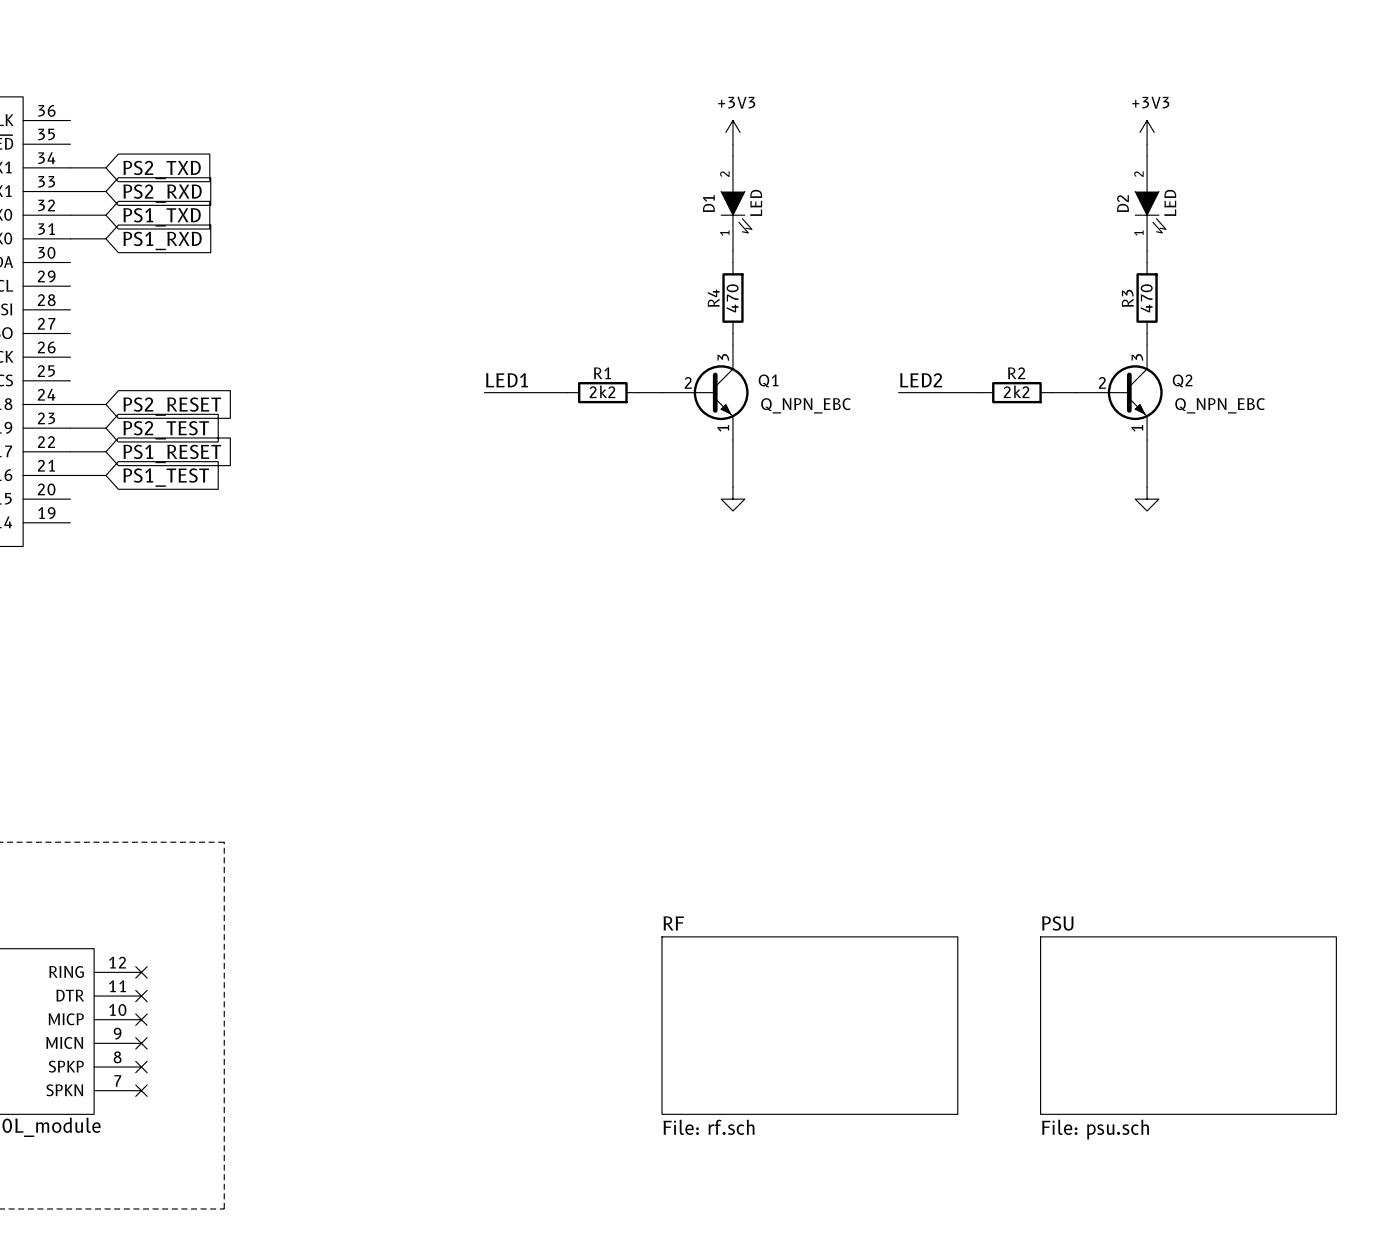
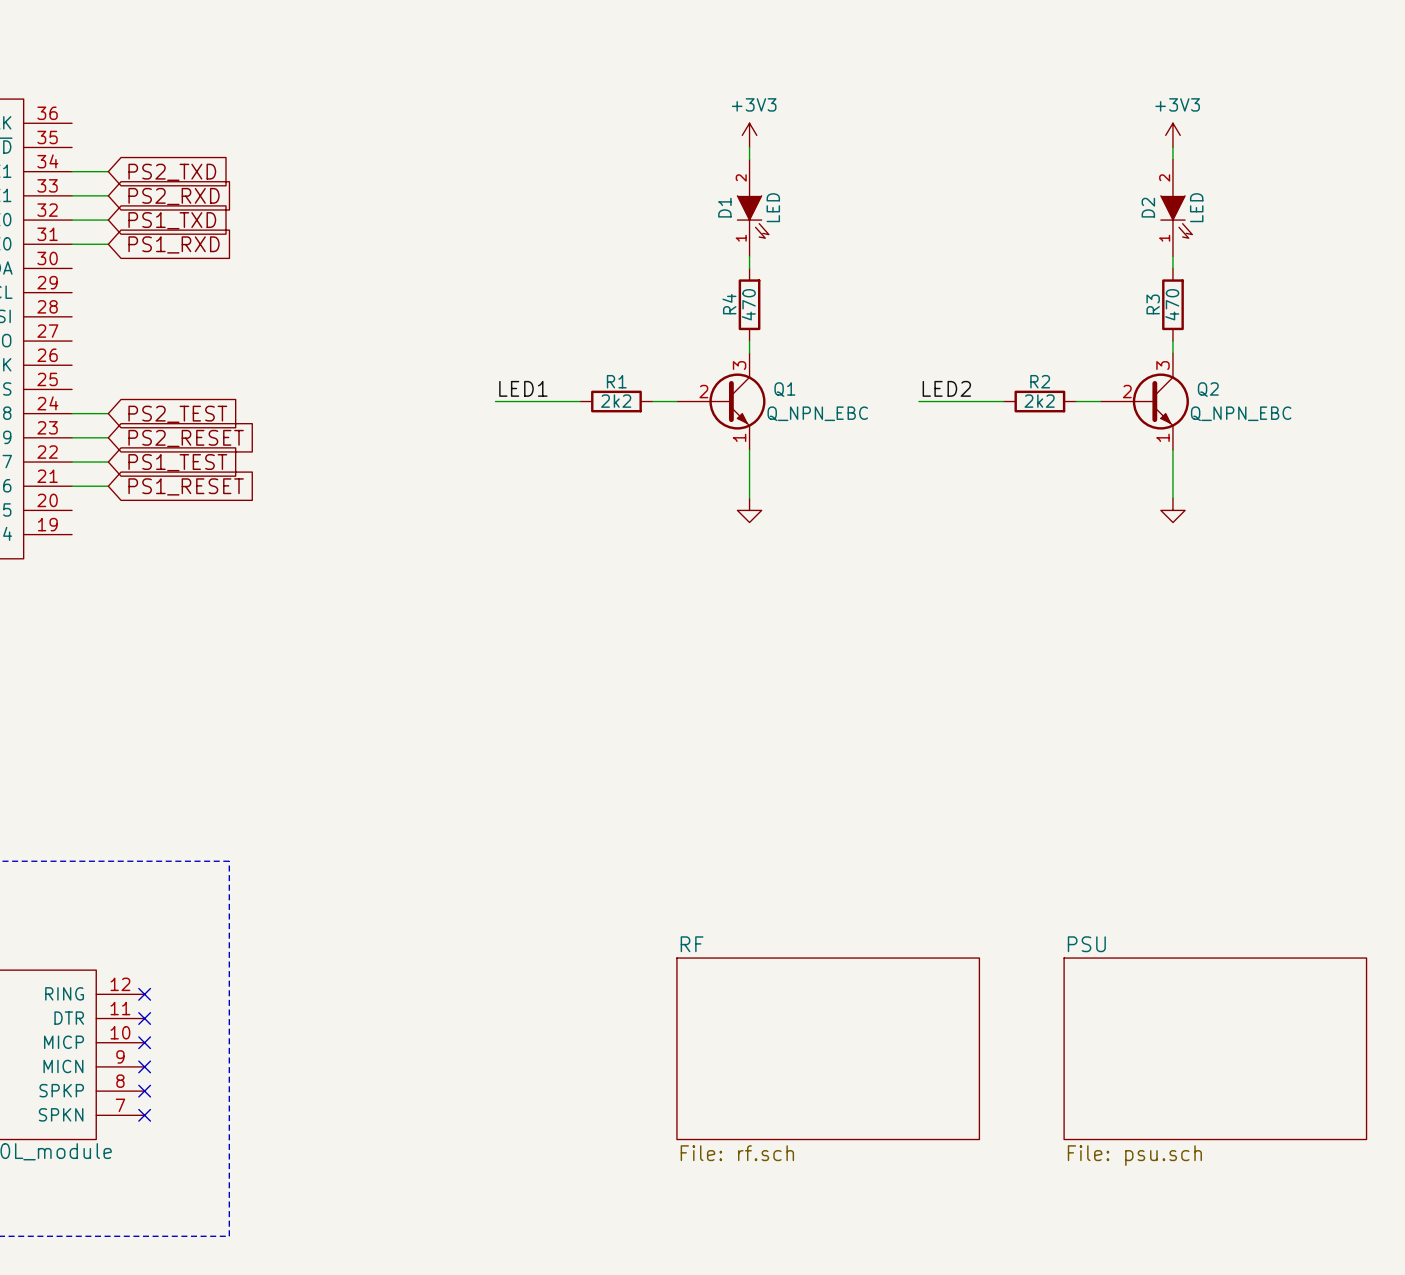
global label: PS2_RESET (172, 406) -> PS2_TEST (177, 414)
global label: PS2_TEST (166, 430) -> PS2_RESET (186, 438)
global label: PS1_RESET (172, 453) -> PS1_TEST (177, 462)
global label: PS1_TEST (166, 477) -> PS1_RESET (186, 486)

